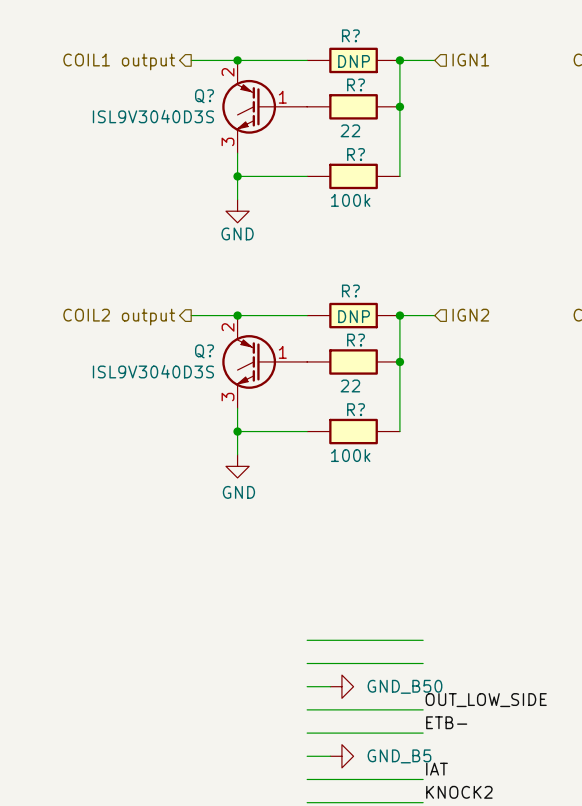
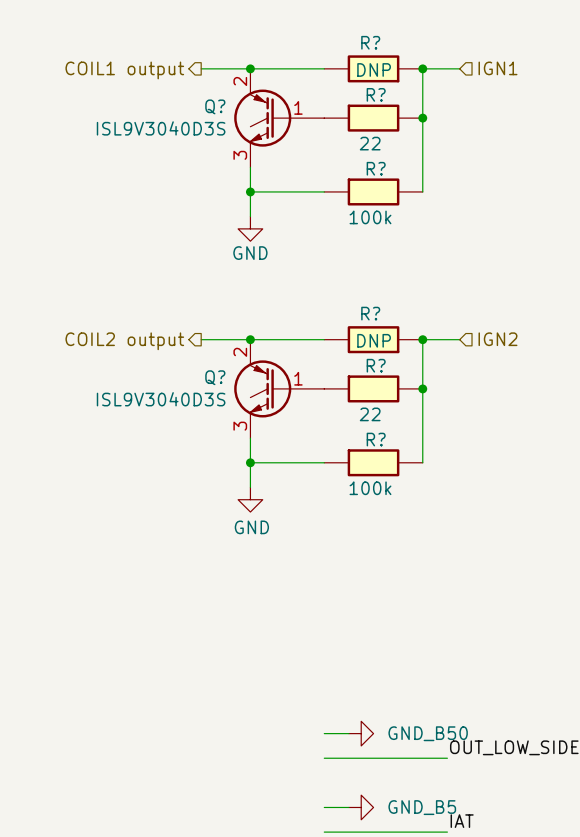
wire: (307, 640) (423, 640) -> none
wire: (307, 663) (423, 663) -> none
label: ETB- (446, 722) -> none
wire: (307, 733) (423, 733) -> none

